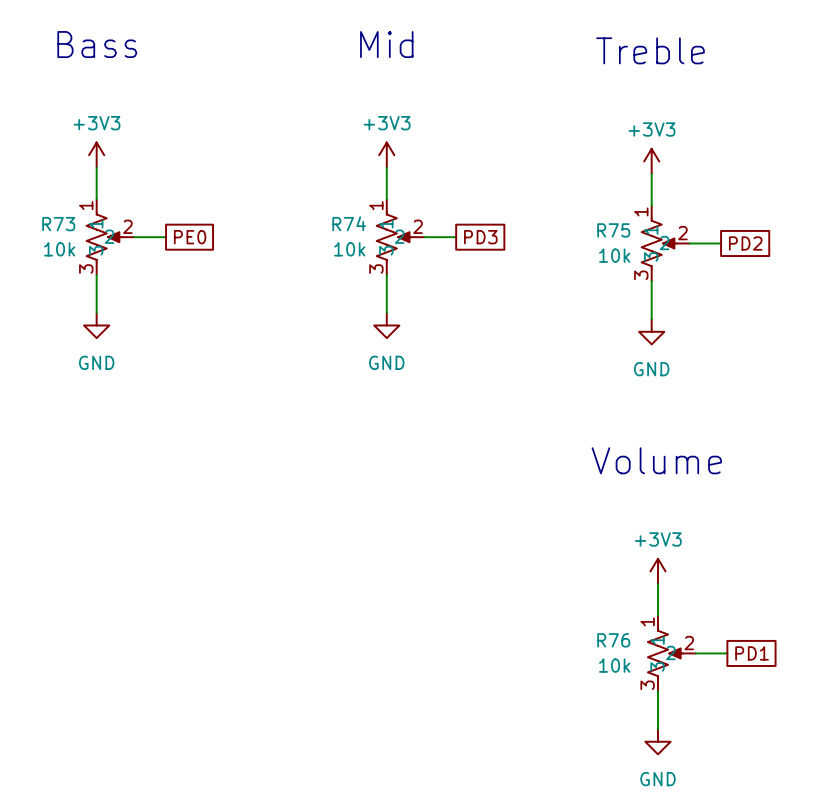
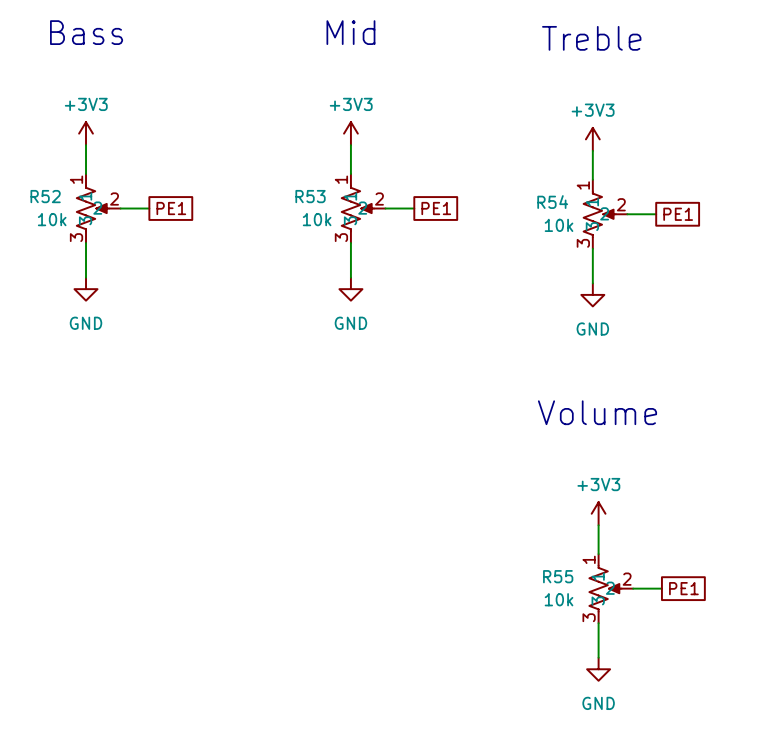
R74 name: R74 (349, 223) -> R53 (310, 196)
R73 name: R73 (58, 224) -> R52 (45, 196)
R75 name: R75 (613, 230) -> R54 (552, 202)
global label: PE0 (190, 237) -> PE1 (171, 208)
global label: PD3 (480, 237) -> PE1 (436, 208)
global label: PD2 (745, 243) -> PE1 (678, 214)
R76 name: R76 (613, 640) -> R55 (558, 576)
global label: PD1 (752, 653) -> PE1 (683, 588)

